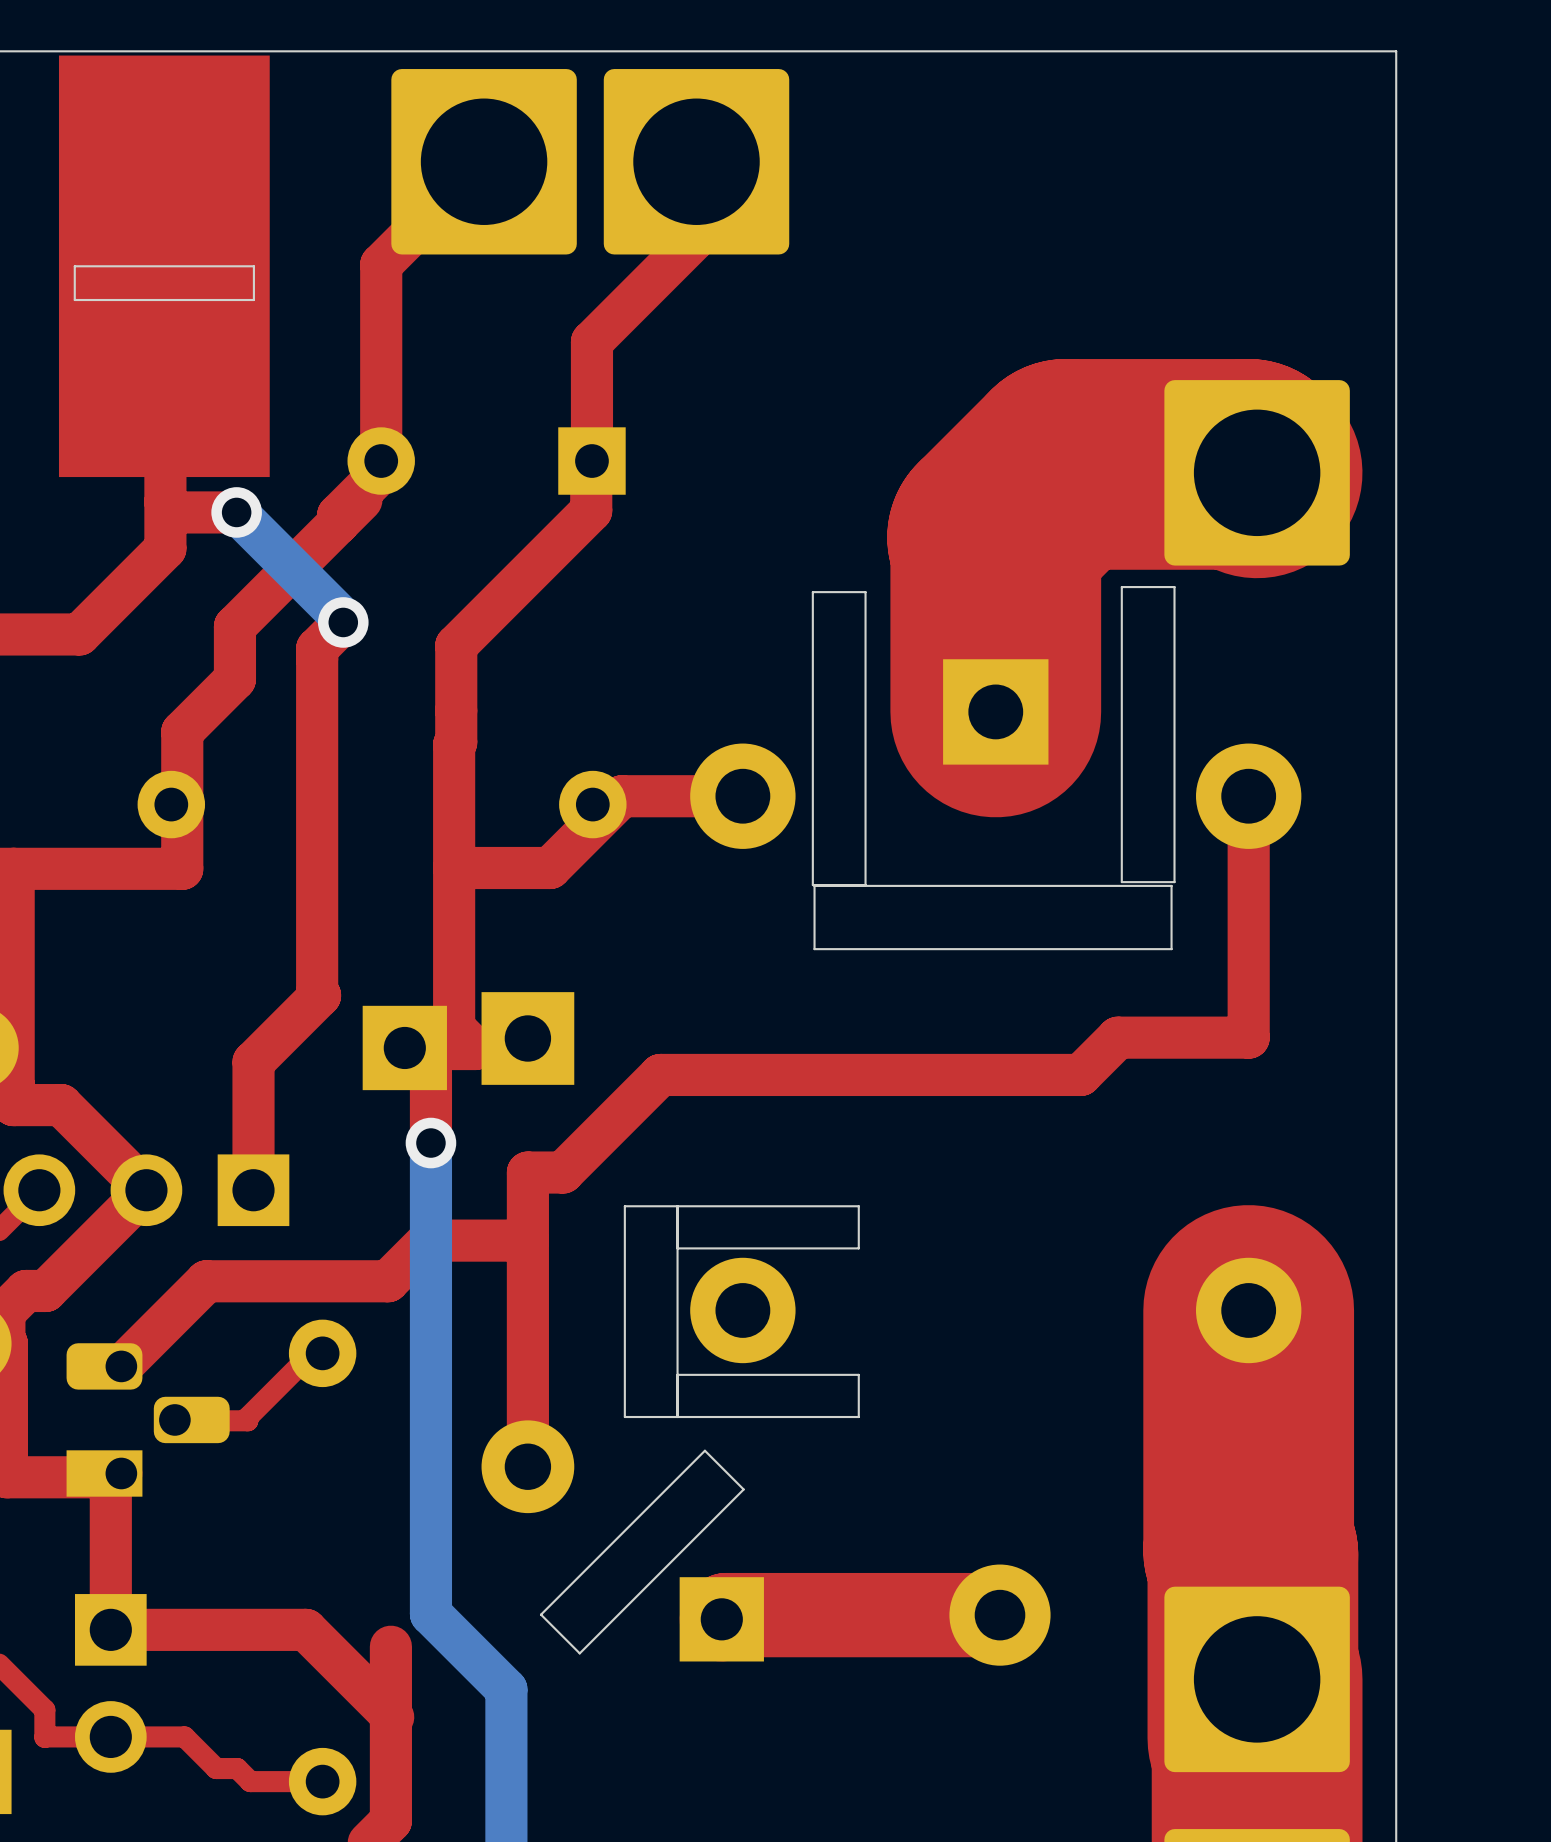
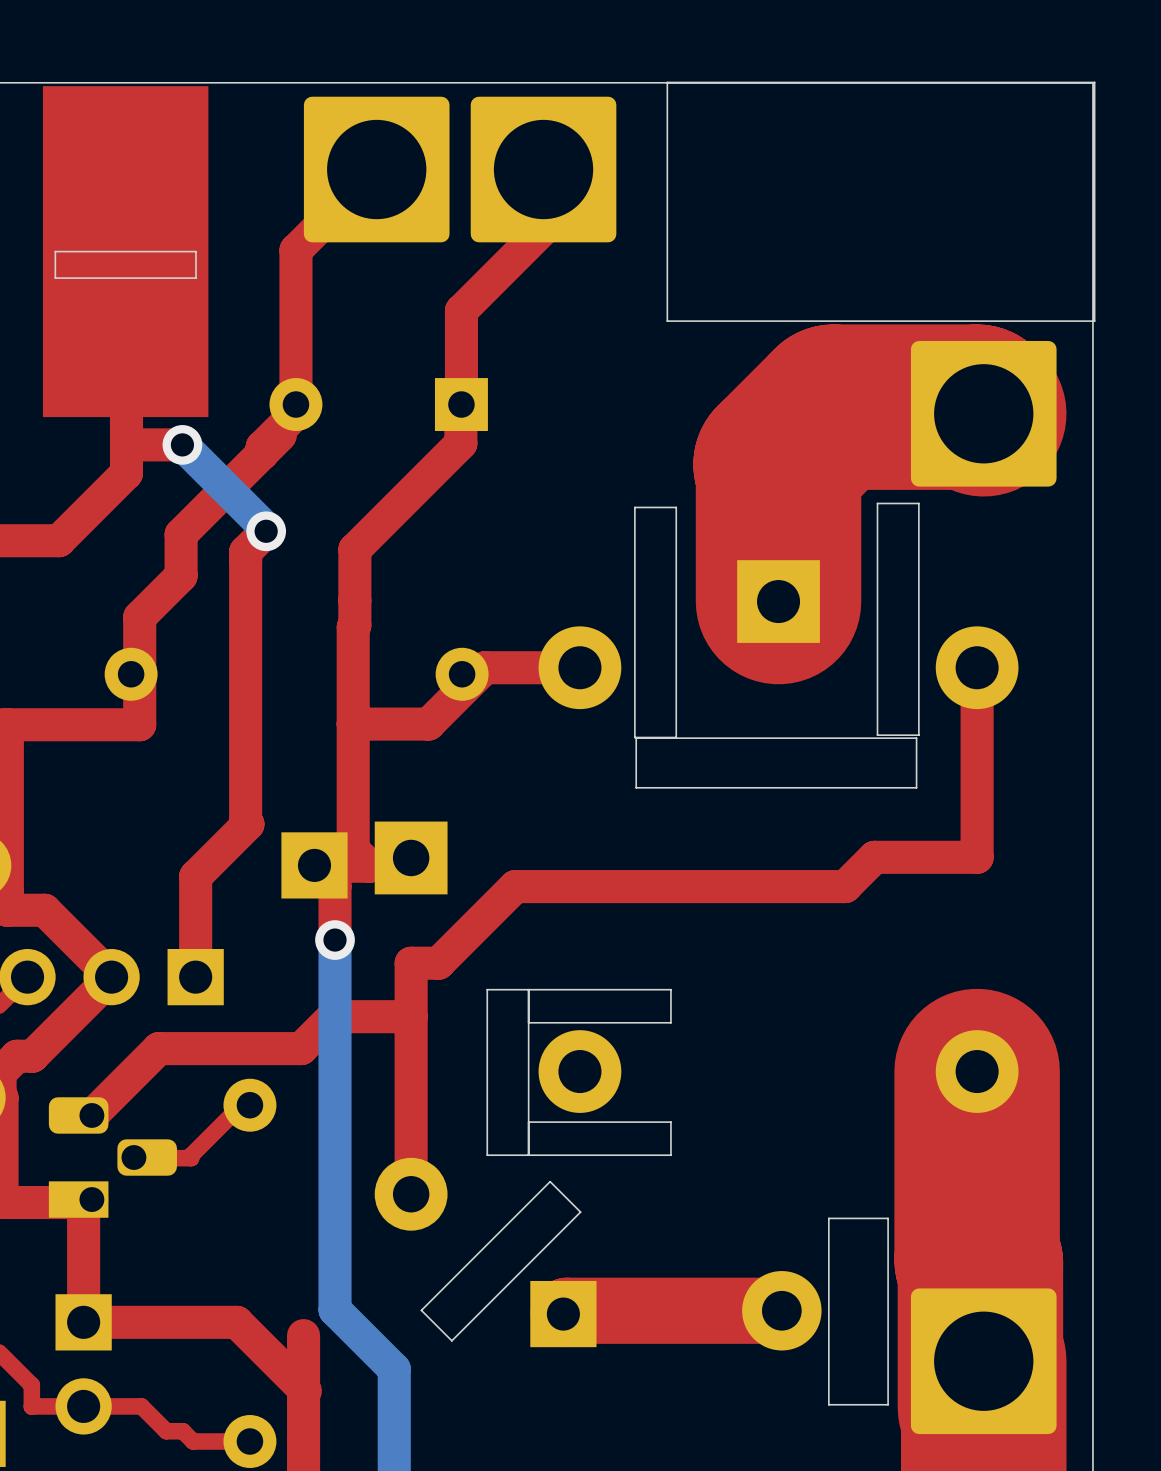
board edge: none -> (1094, 82) (667, 82) (667, 321) (1094, 321) (1094, 82)
board edge: none -> (888, 1218) (828, 1218) (828, 1404) (888, 1404) (888, 1218)

